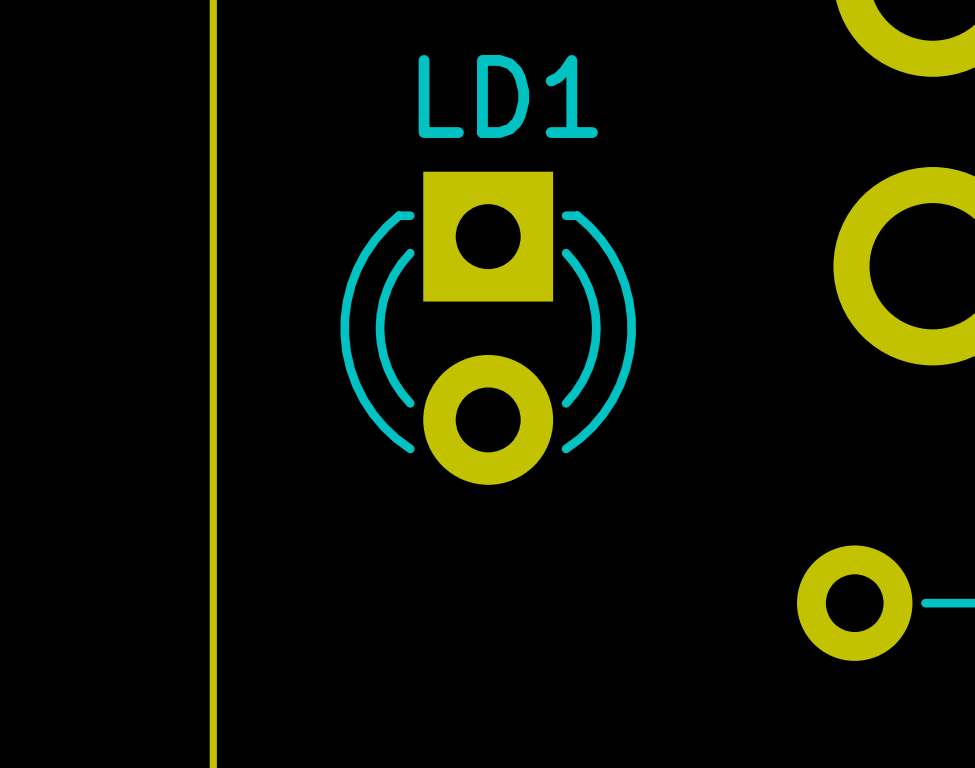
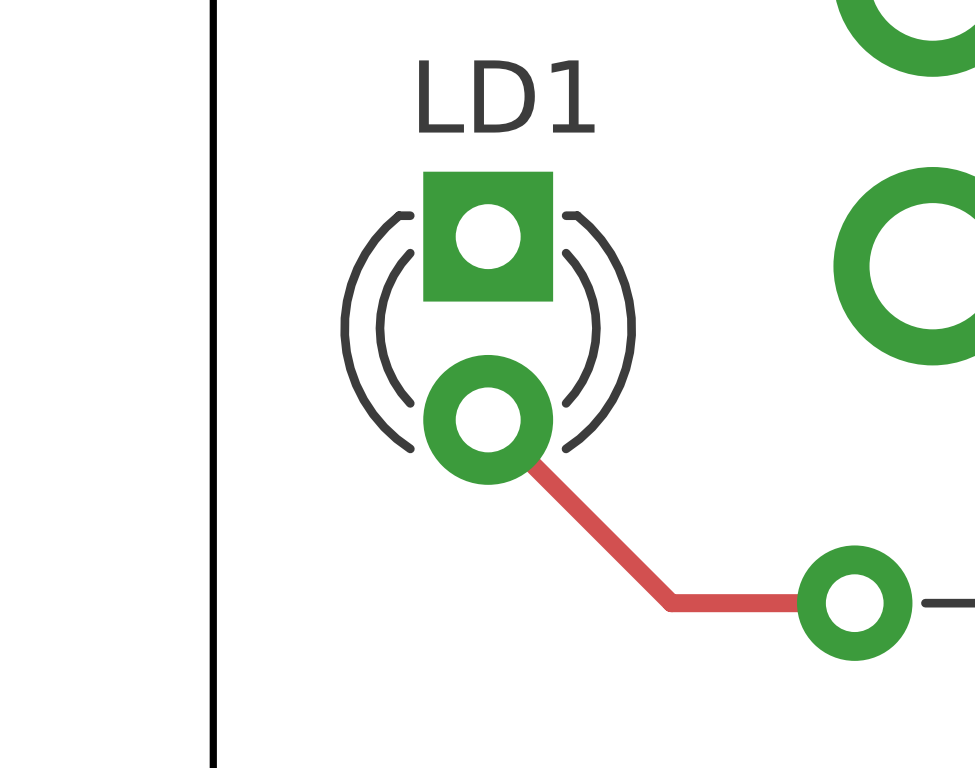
track: none -> (488, 419) (671, 603) (854, 603)

